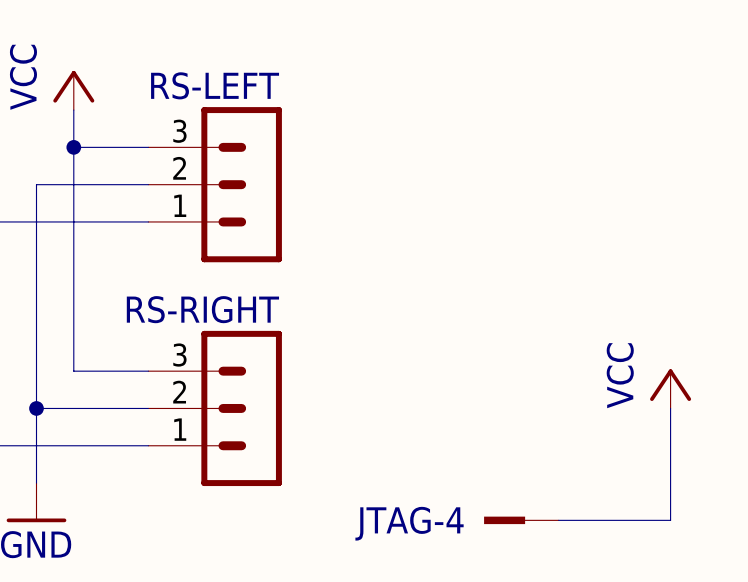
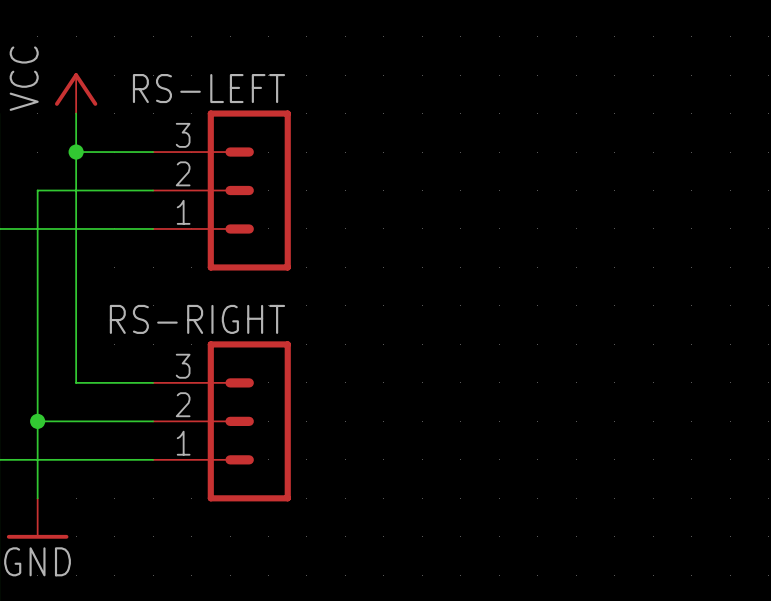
power symbol: VCC (670, 388) -> none
wire: (670, 408) (670, 520) (558, 520) -> none
JTAG-4: (521, 520) -> none

